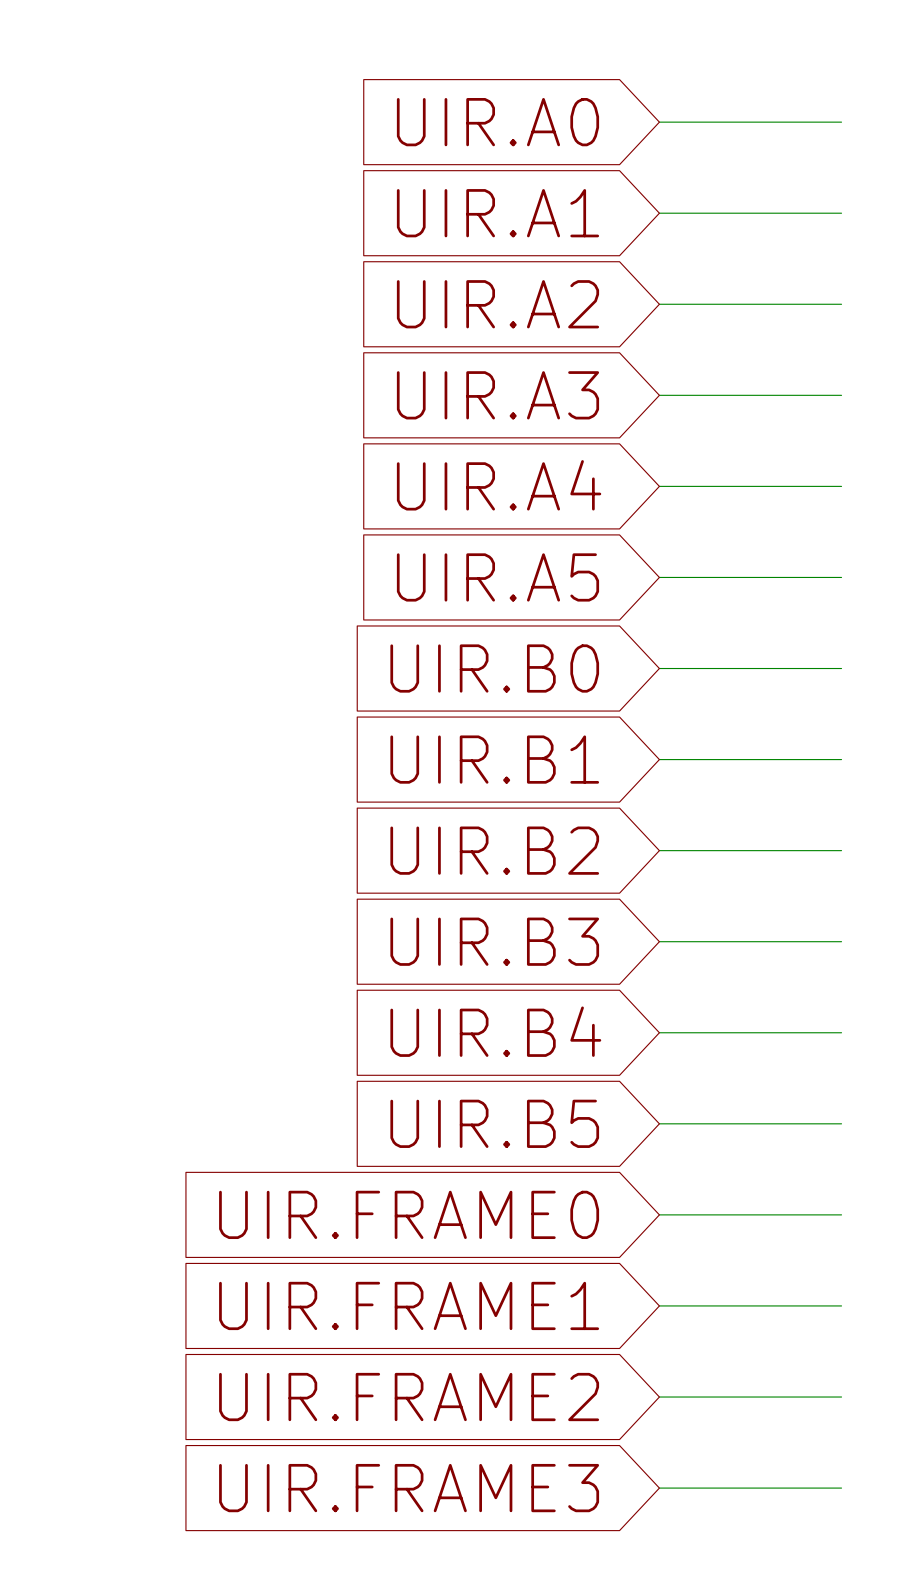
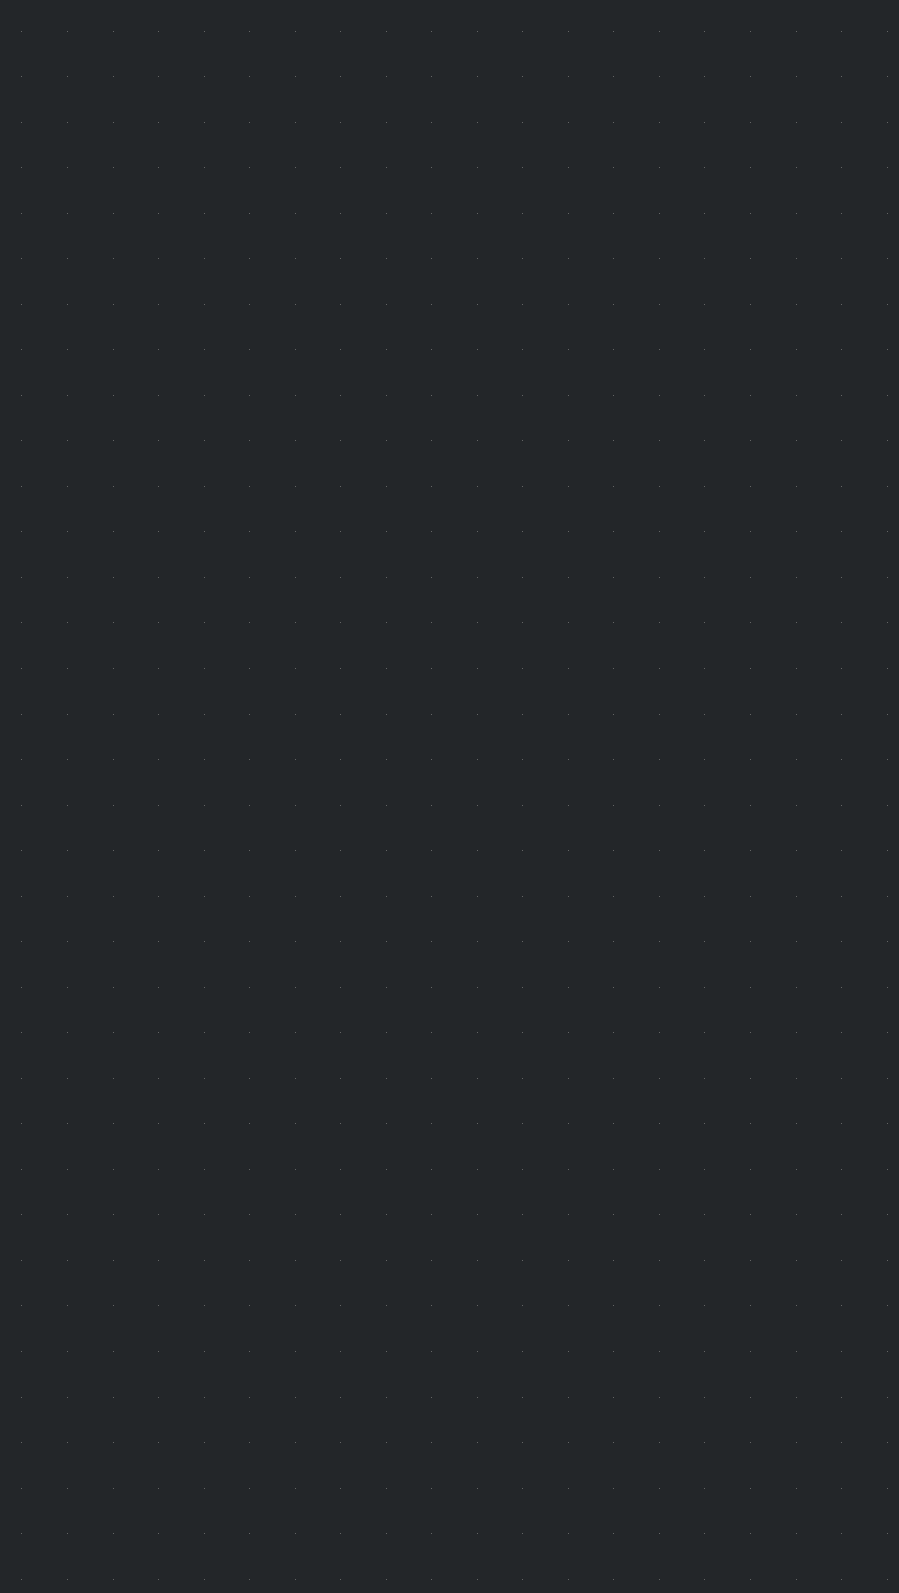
global label: UIR.A0 (497, 122) -> none
wire: (659, 122) (841, 122) -> none
global label: UIR.A1 (497, 213) -> none
wire: (659, 213) (841, 213) -> none
global label: UIR.A2 (497, 304) -> none
wire: (659, 304) (841, 304) -> none
global label: UIR.A3 (497, 395) -> none
wire: (659, 395) (841, 395) -> none
global label: UIR.A4 (499, 485) -> none
wire: (659, 486) (841, 486) -> none
global label: UIR.A5 (497, 577) -> none
wire: (659, 577) (841, 577) -> none
global label: UIR.B0 (494, 668) -> none
wire: (659, 668) (841, 668) -> none
global label: UIR.B1 (494, 759) -> none
wire: (659, 759) (841, 759) -> none
global label: UIR.B2 (494, 850) -> none
wire: (659, 850) (841, 850) -> none
global label: UIR.B3 (494, 941) -> none
wire: (659, 941) (841, 941) -> none
global label: UIR.B4 (495, 1031) -> none
wire: (659, 1032) (841, 1032) -> none
global label: UIR.B5 (494, 1123) -> none
wire: (659, 1123) (841, 1123) -> none
global label: UIR.FRAME0 (409, 1214) -> none
wire: (659, 1214) (841, 1214) -> none
global label: UIR.FRAME1 (409, 1305) -> none
wire: (659, 1305) (841, 1305) -> none
global label: UIR.FRAME2 (409, 1397) -> none
wire: (659, 1397) (841, 1397) -> none
global label: UIR.FRAME3 (409, 1488) -> none
wire: (659, 1488) (841, 1488) -> none

